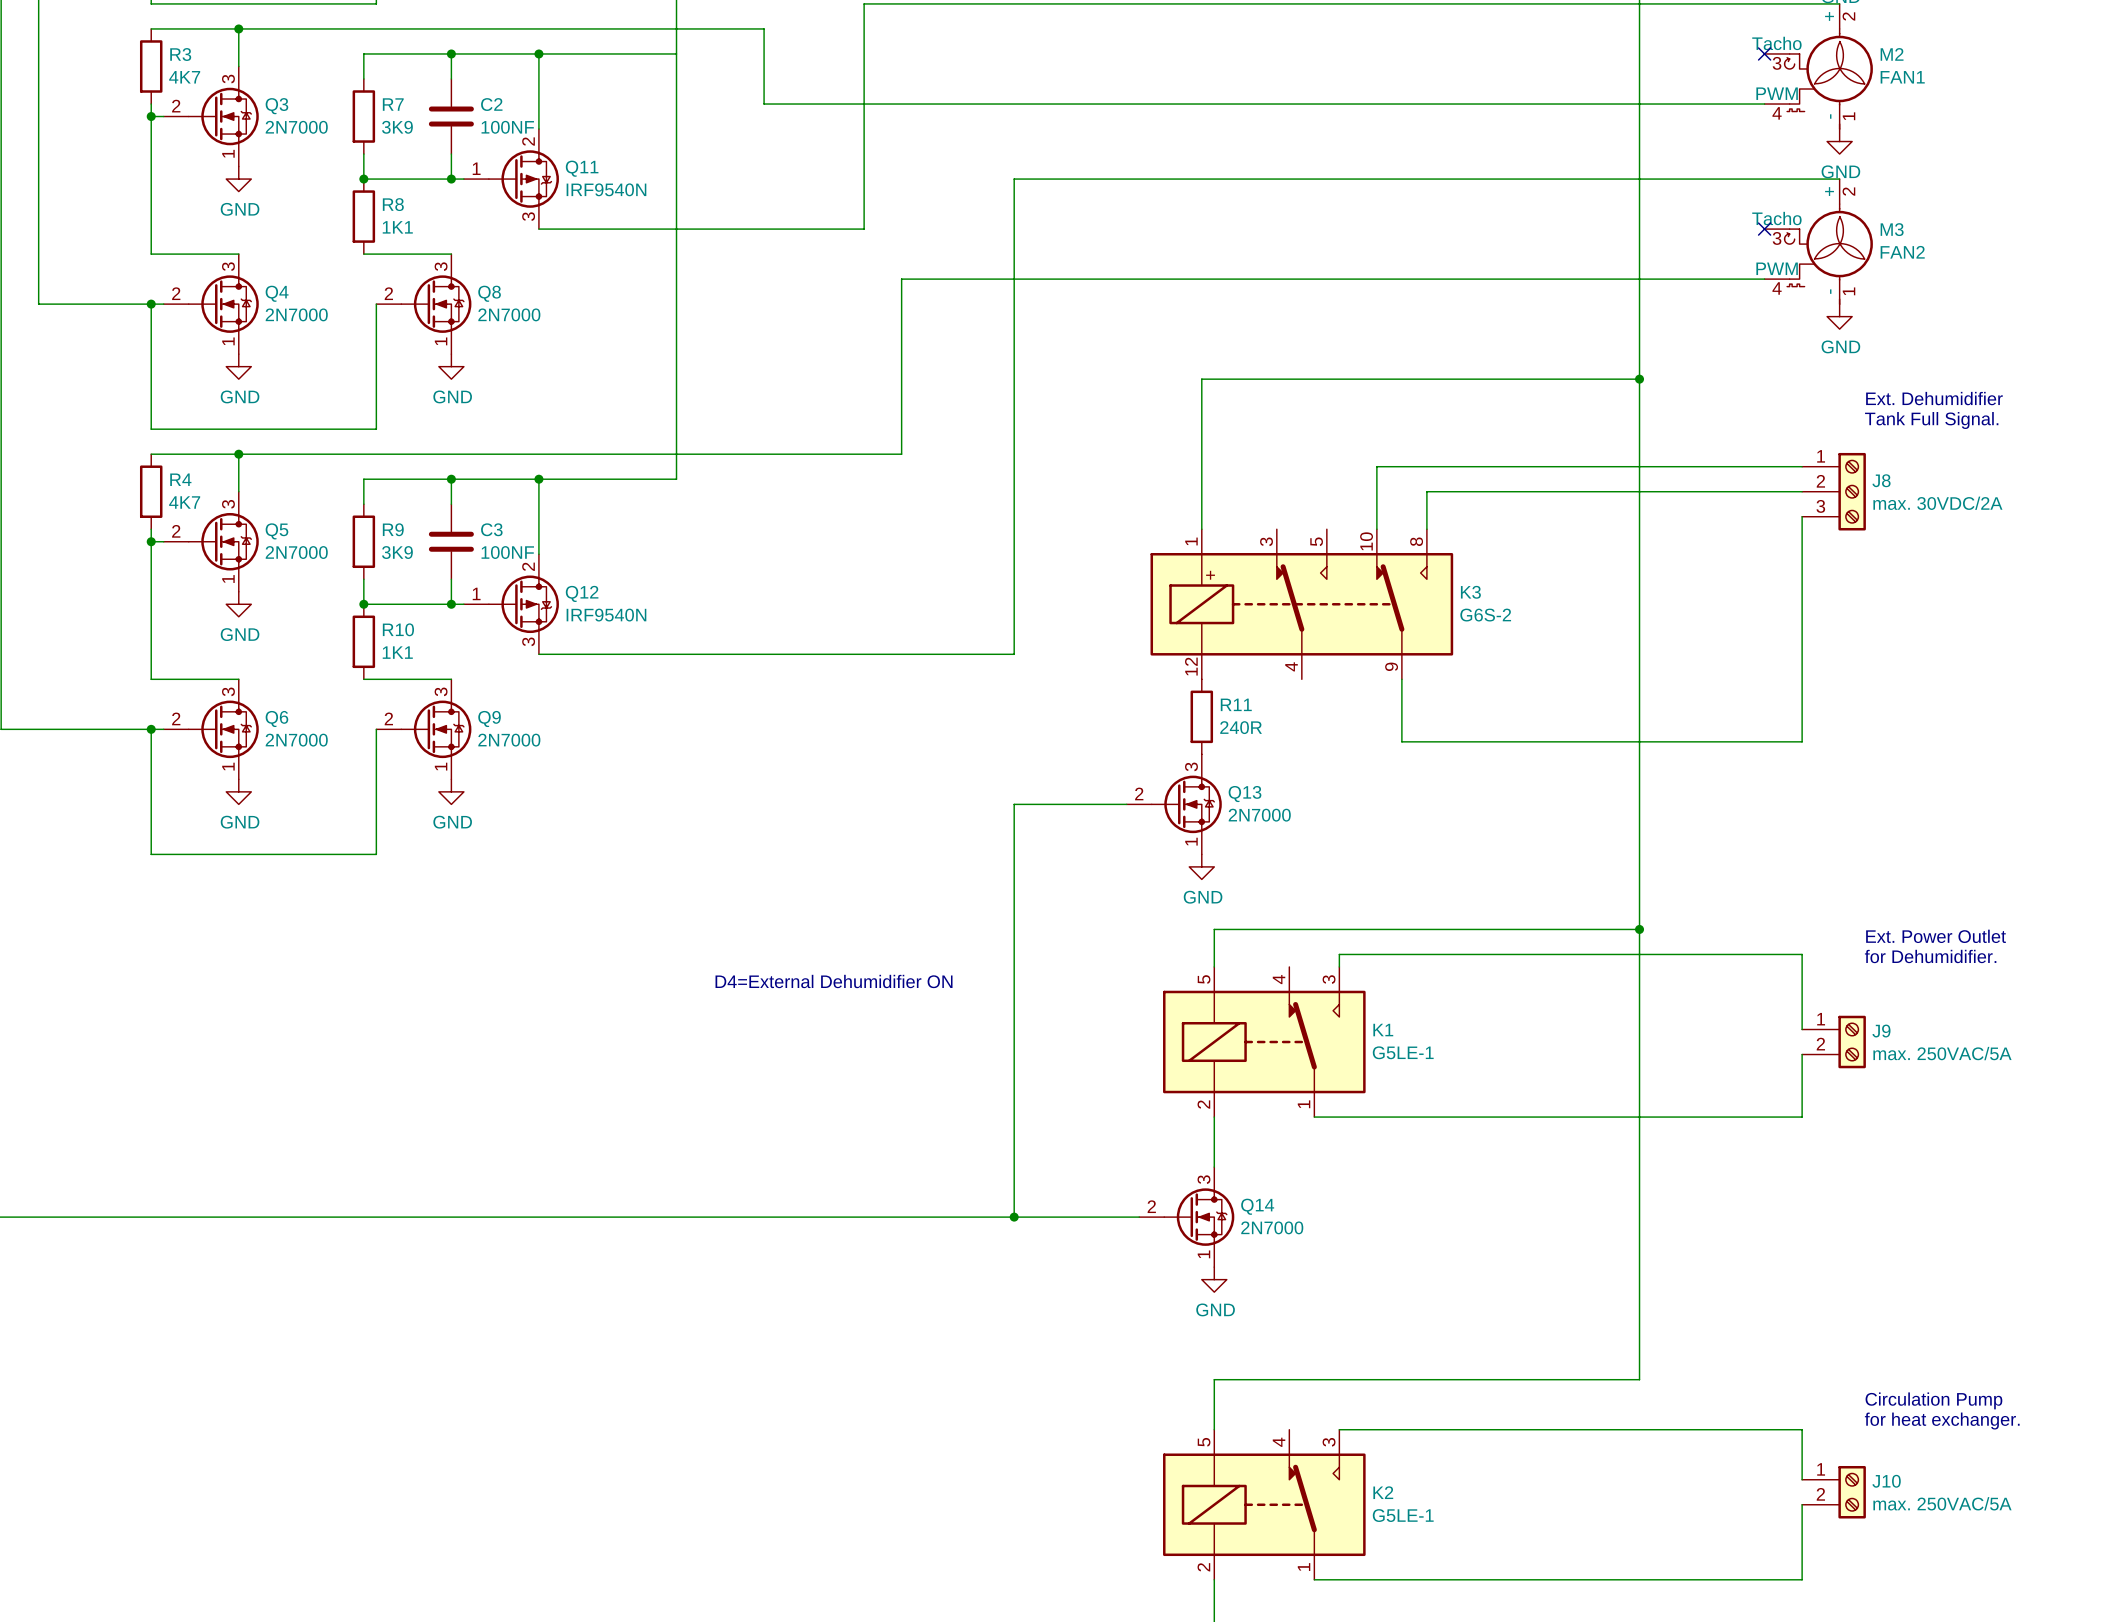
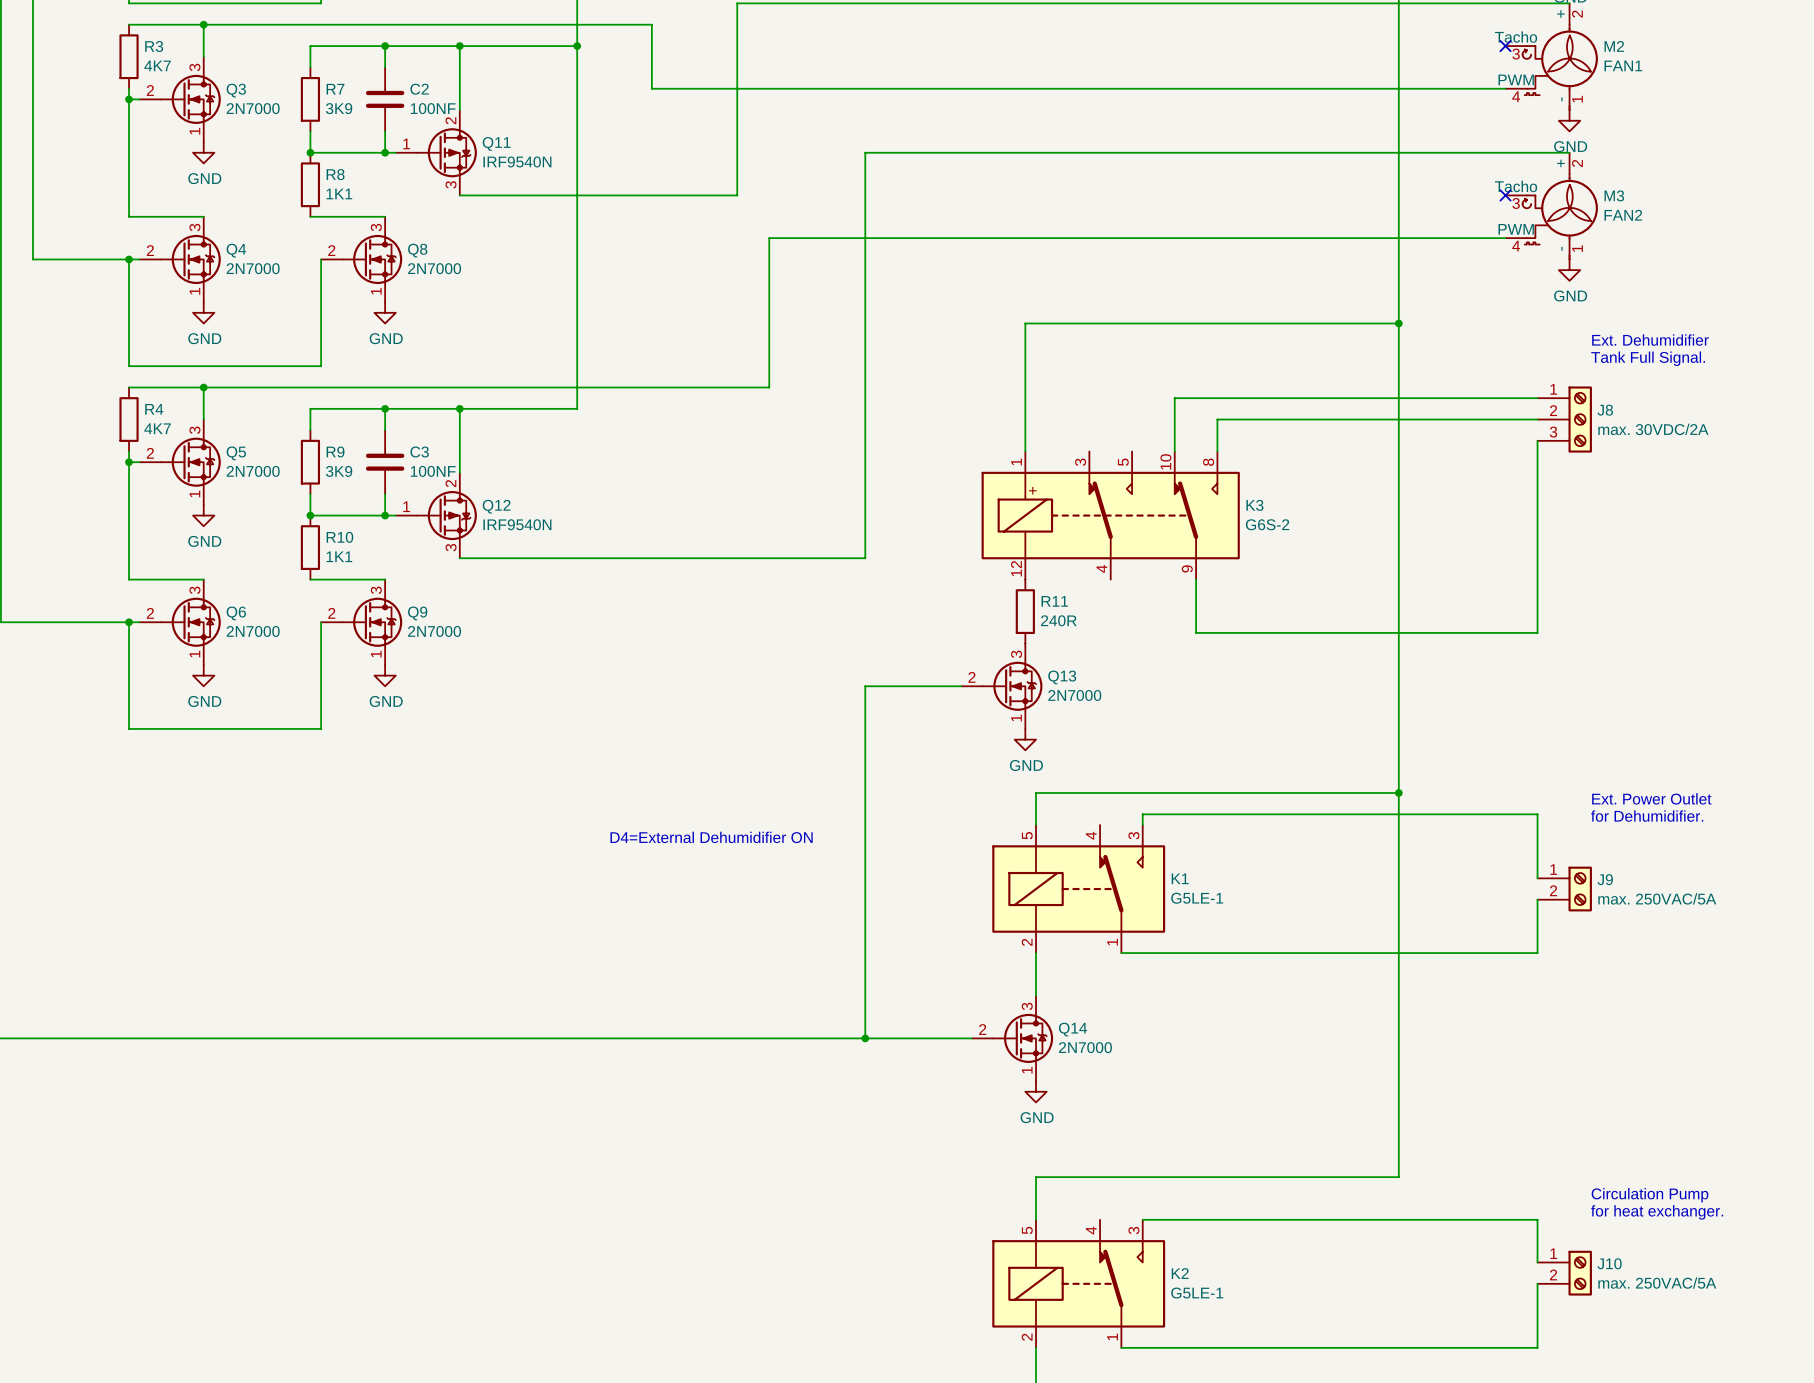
junction: none -> (577, 46)

